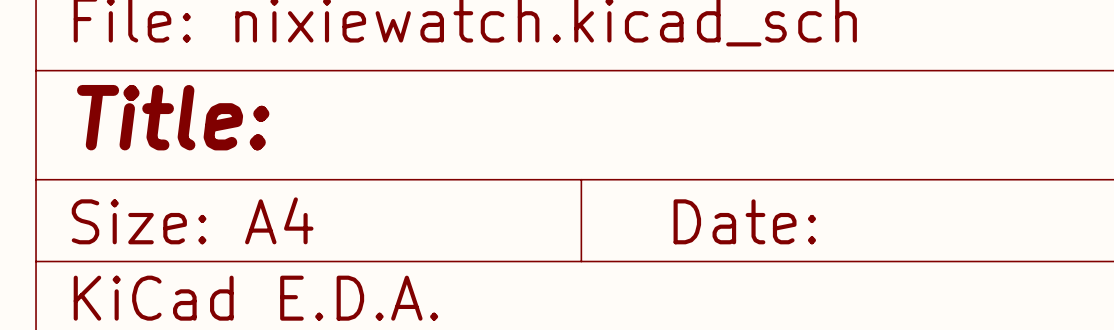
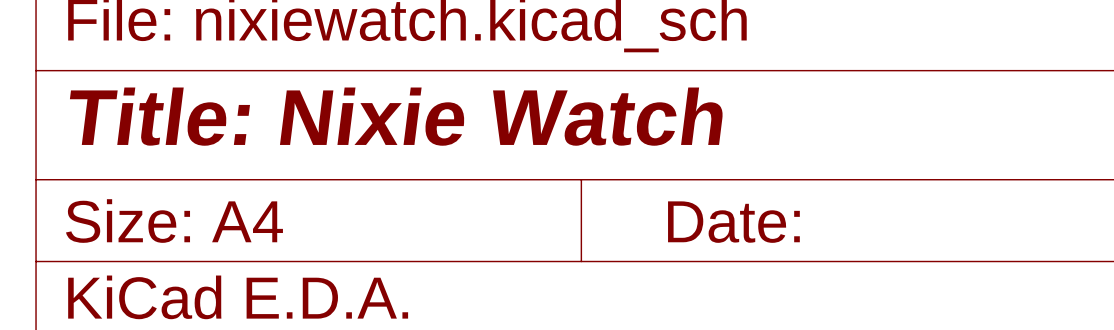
title block: Title: (173, 117) -> Title: Nixie Watch (396, 116)

